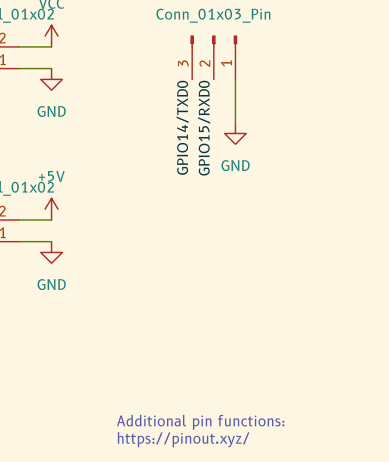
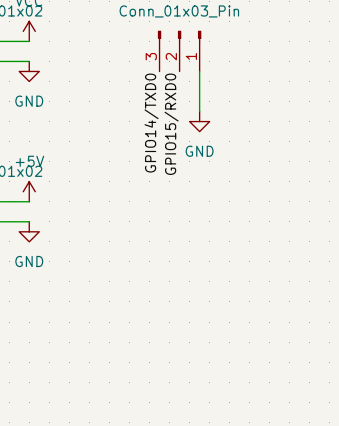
text: Additional pin functions: (200, 422) -> none
text: https://pinout.xyz/ (183, 439) -> none

